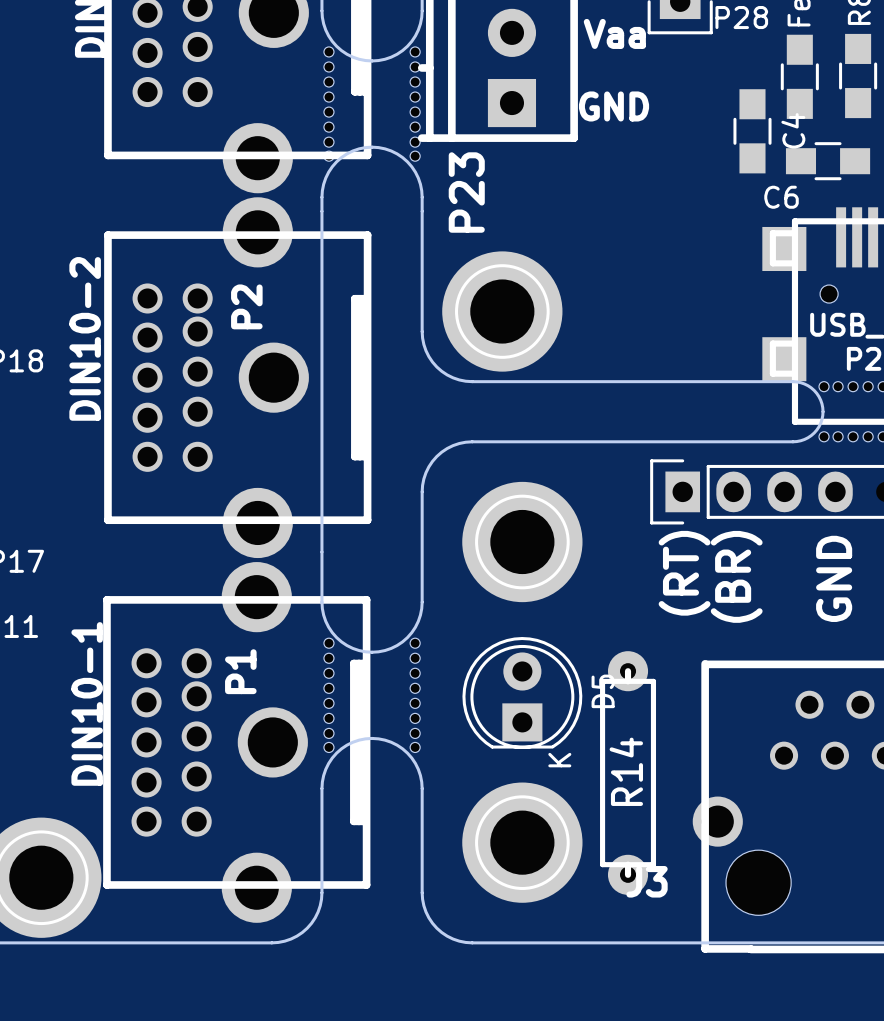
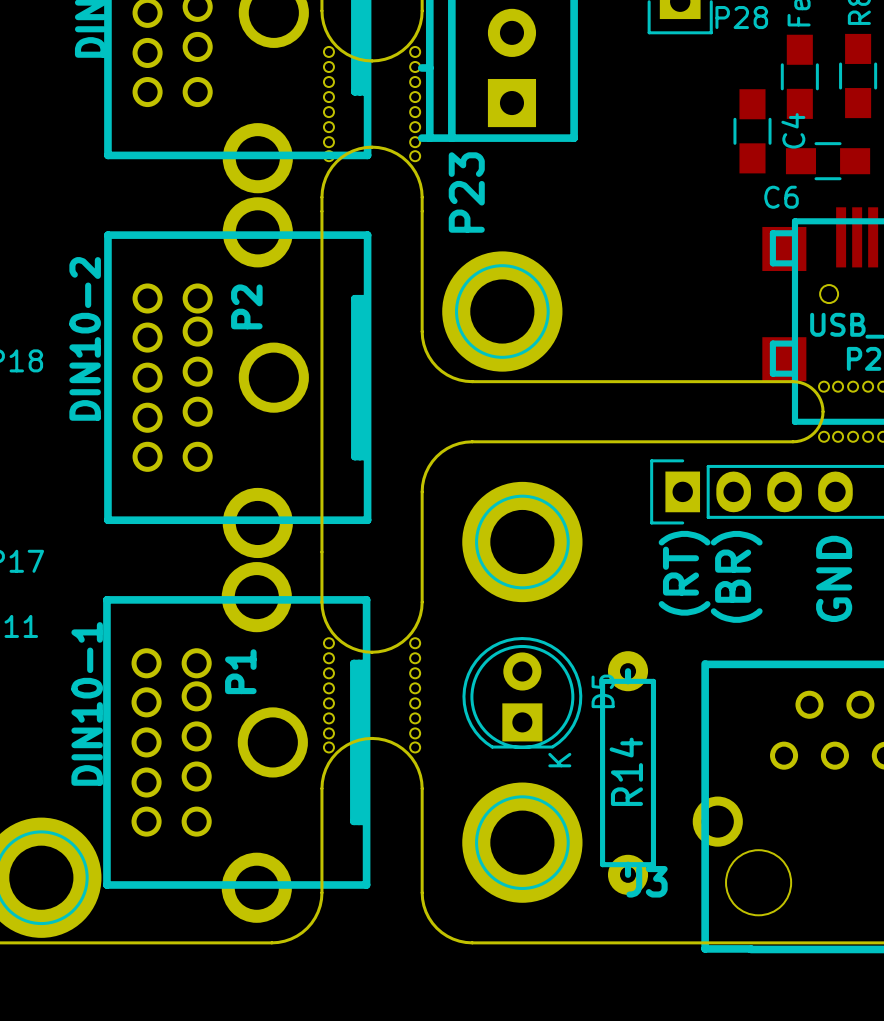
text: Vaa (614, 33) -> none
text: GND (614, 106) -> none

